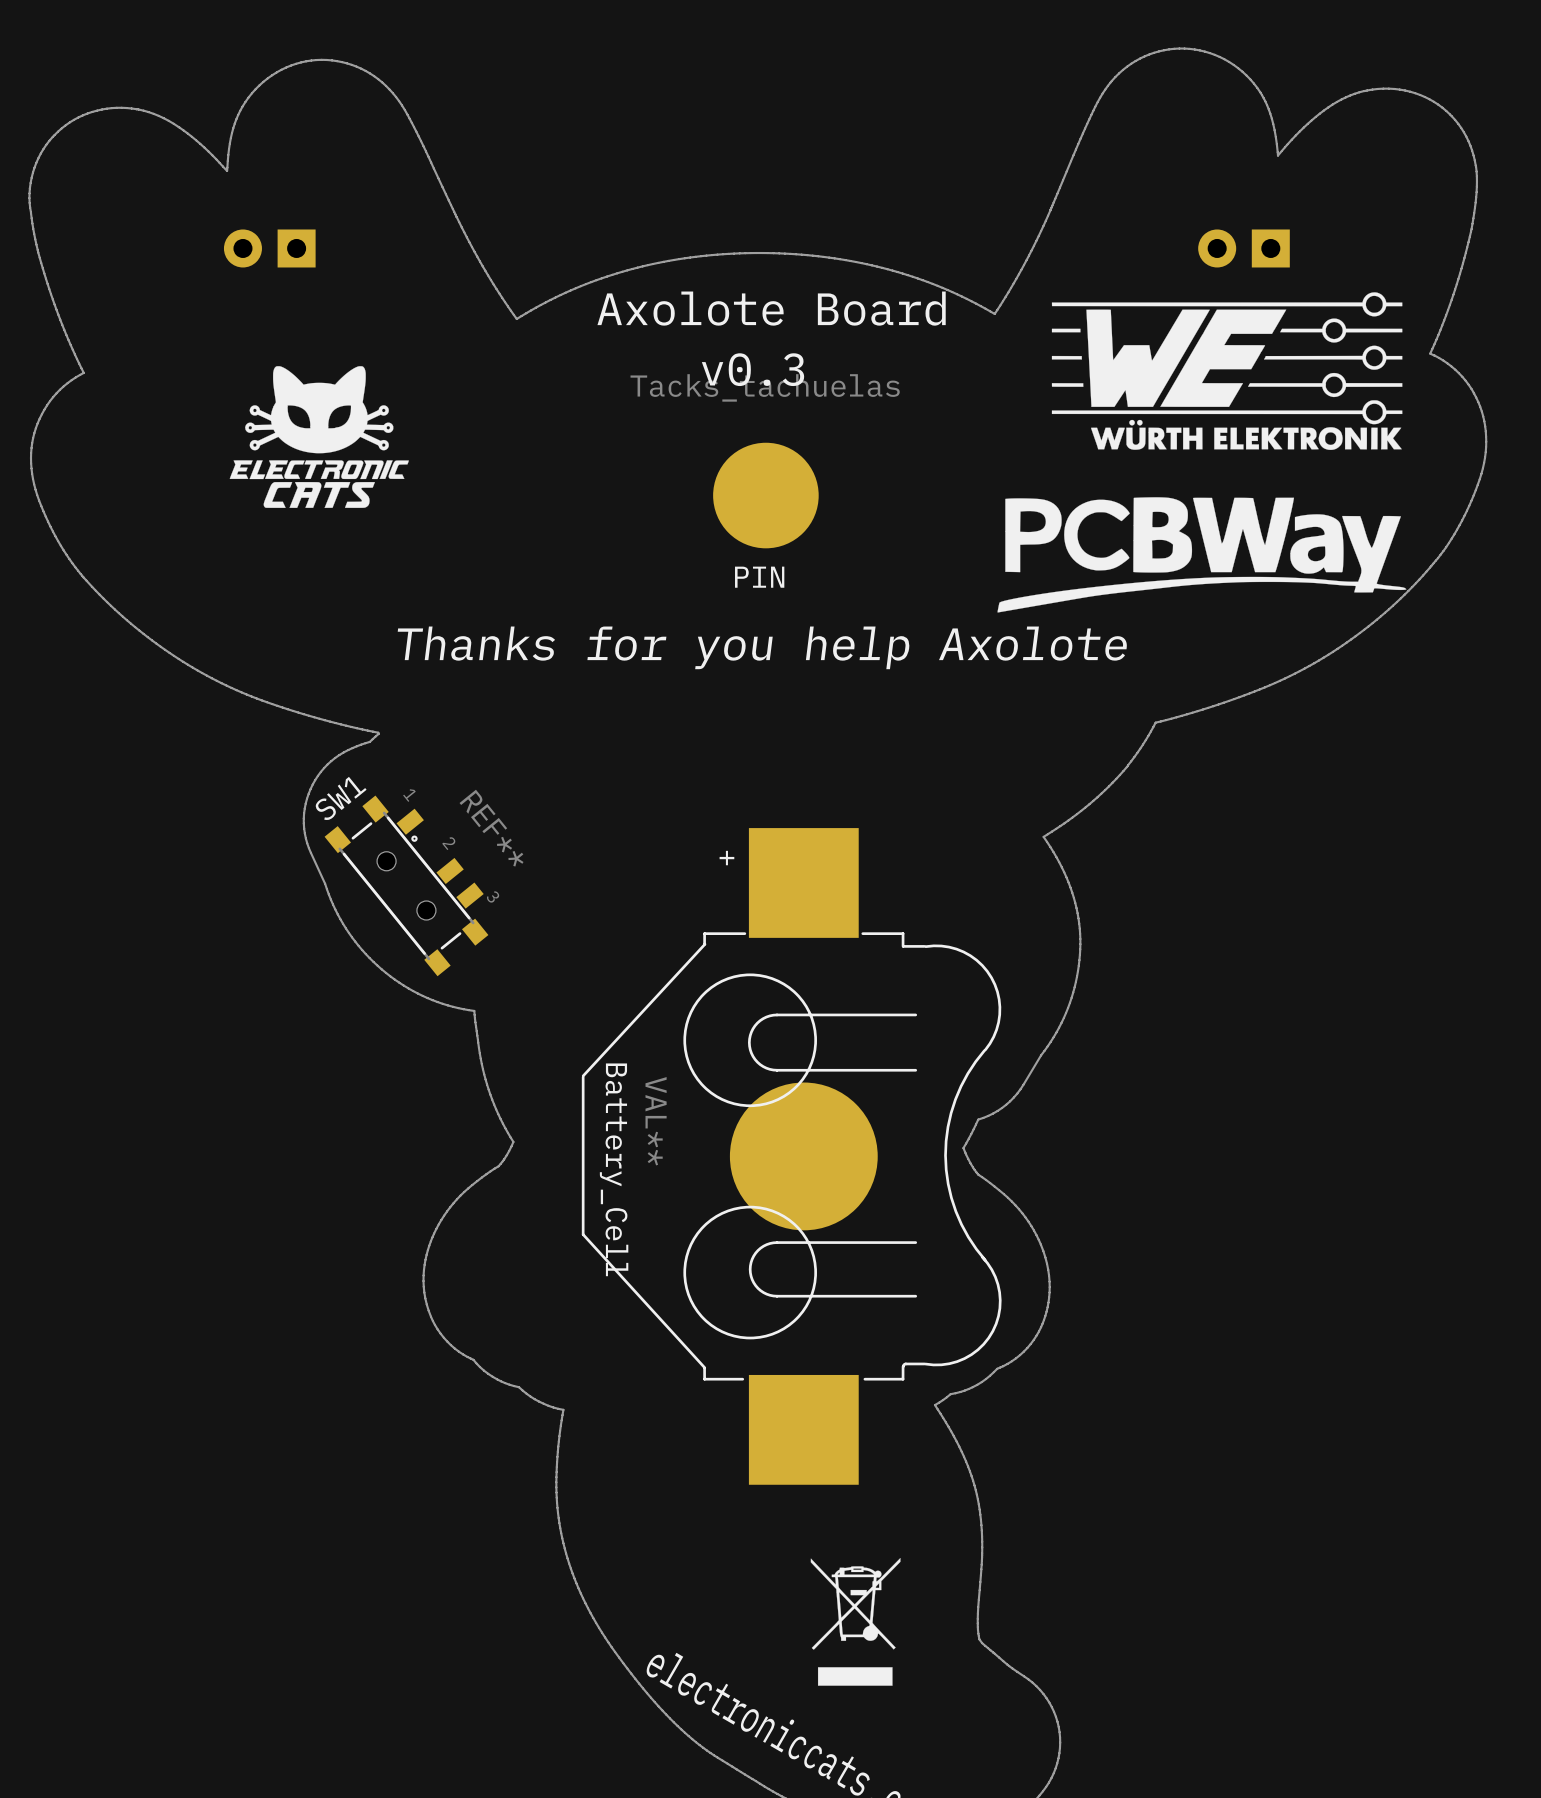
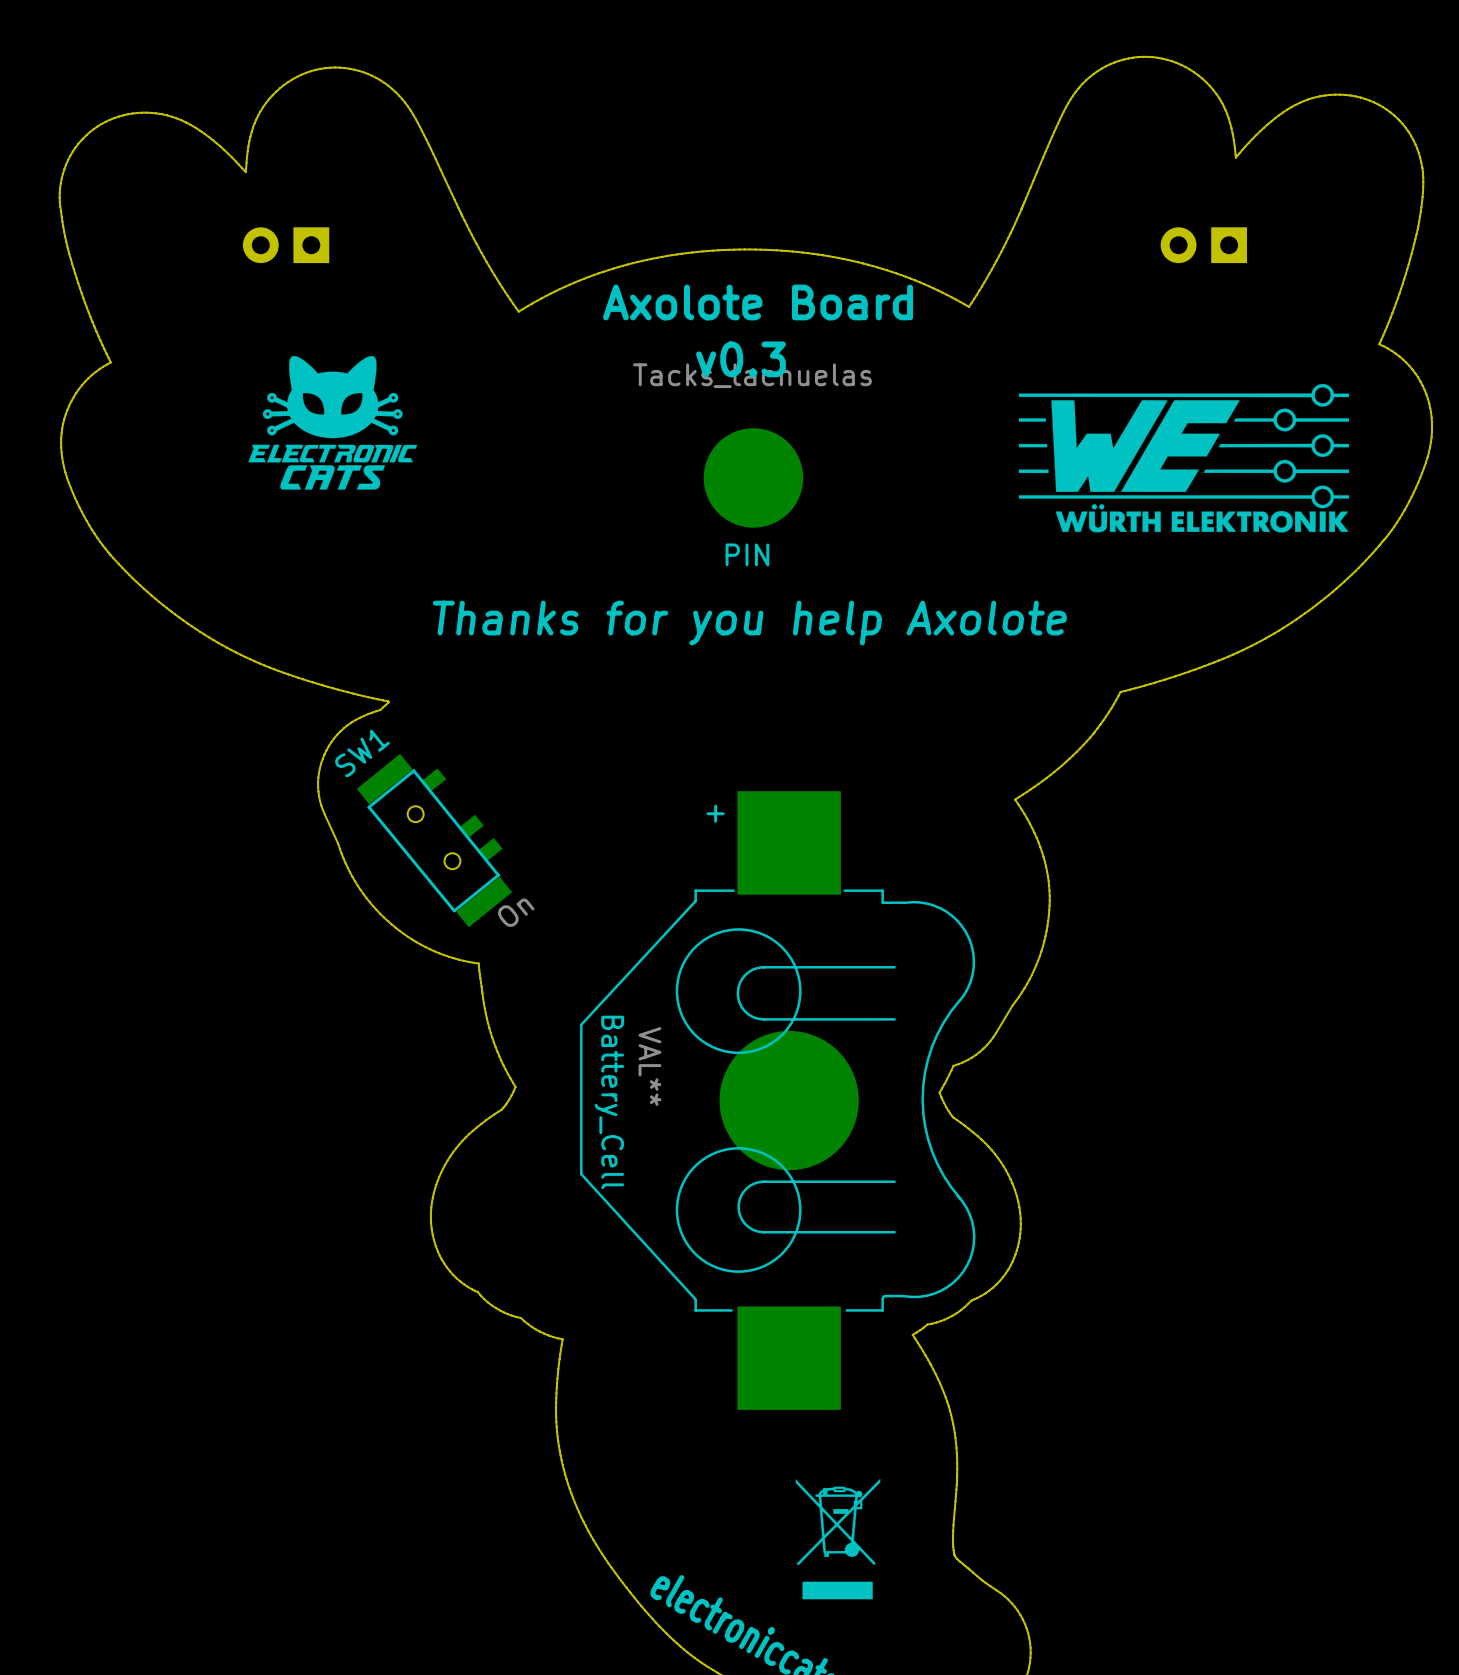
drawing position: (1227, 371) -> (1183, 458)
drawing: [997, 497, 1407, 613] -> none
text: SW1 (340, 798) -> none
SW1: none -> On (434, 840)
part: (406, 885) -> none

